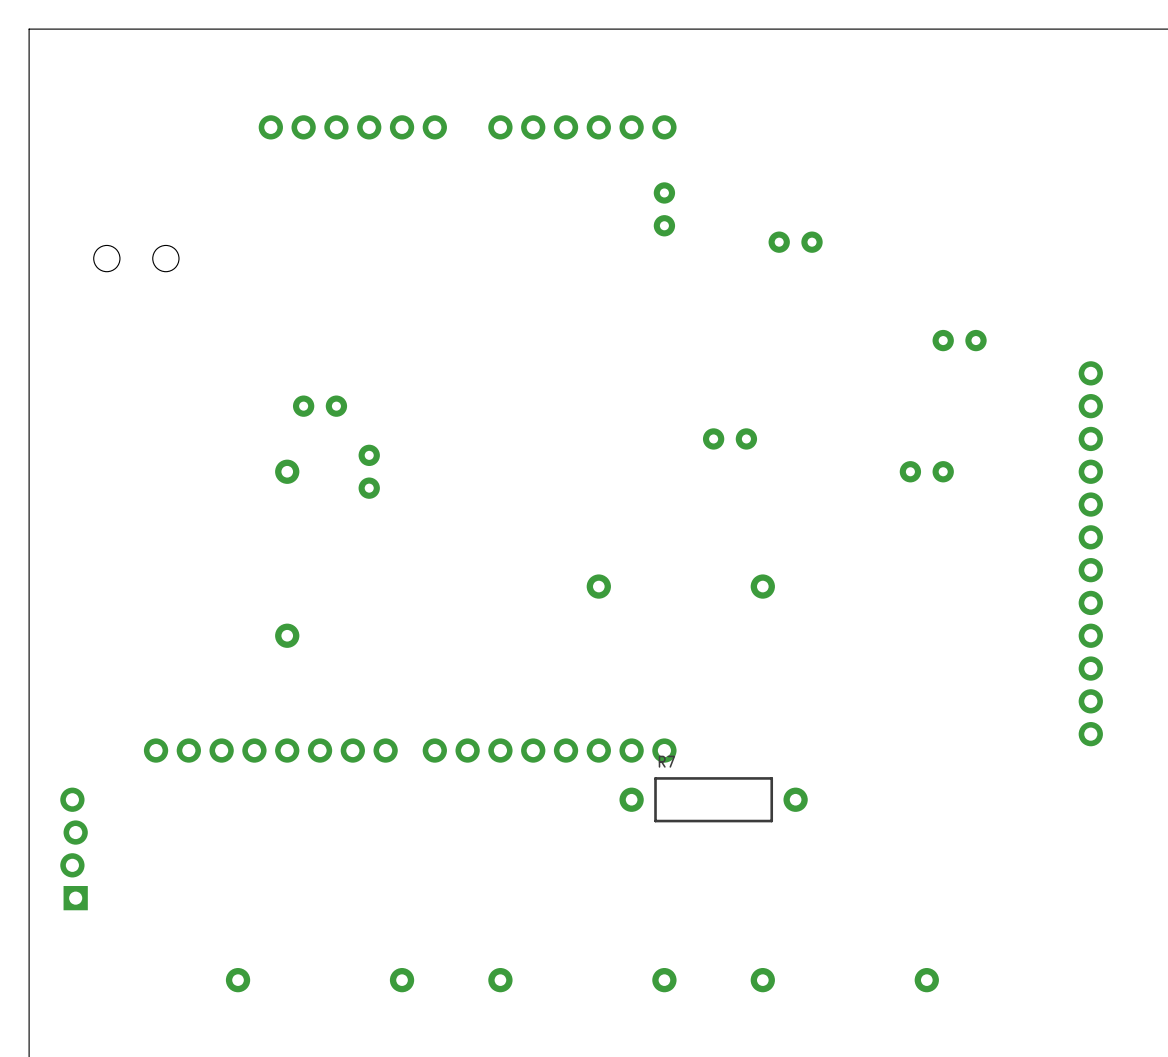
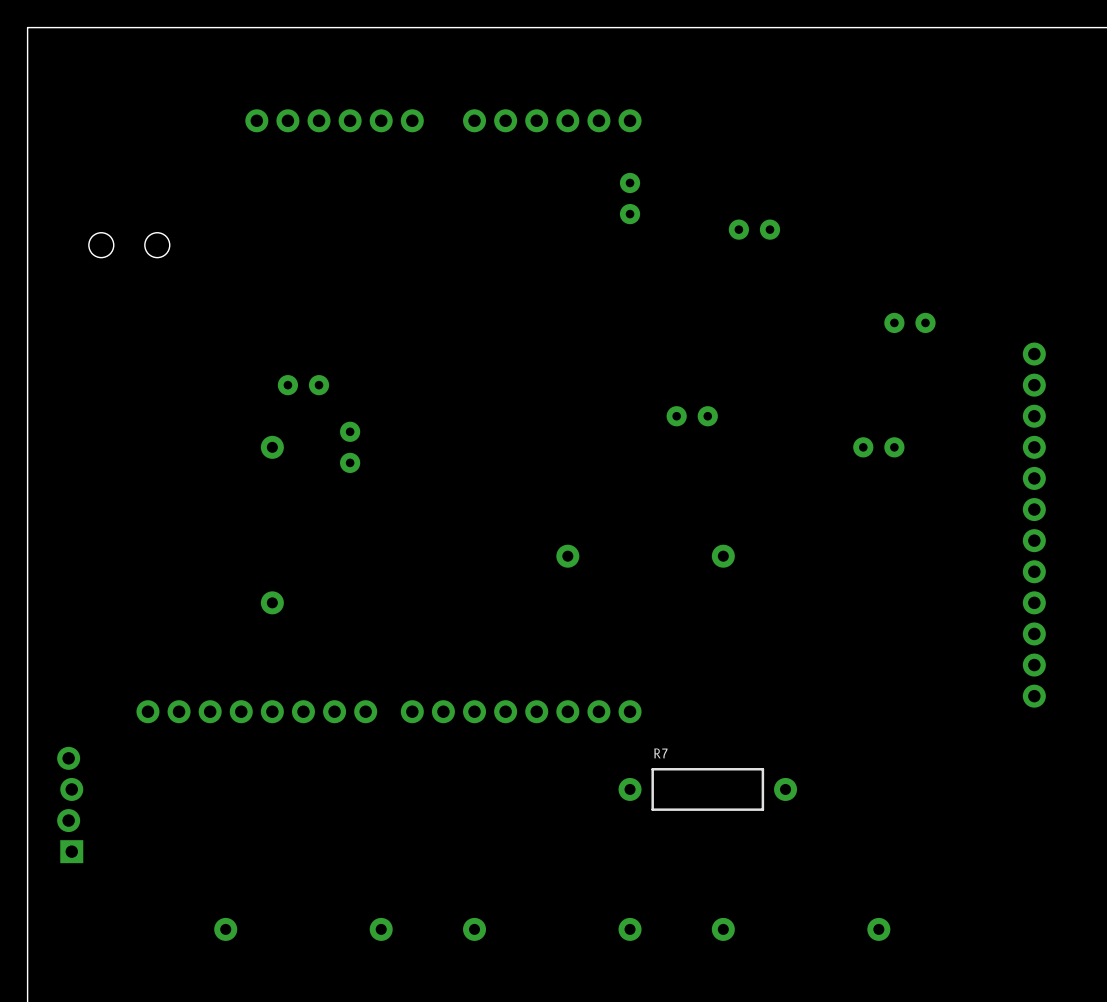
R7 position: (713, 799) -> (707, 789)

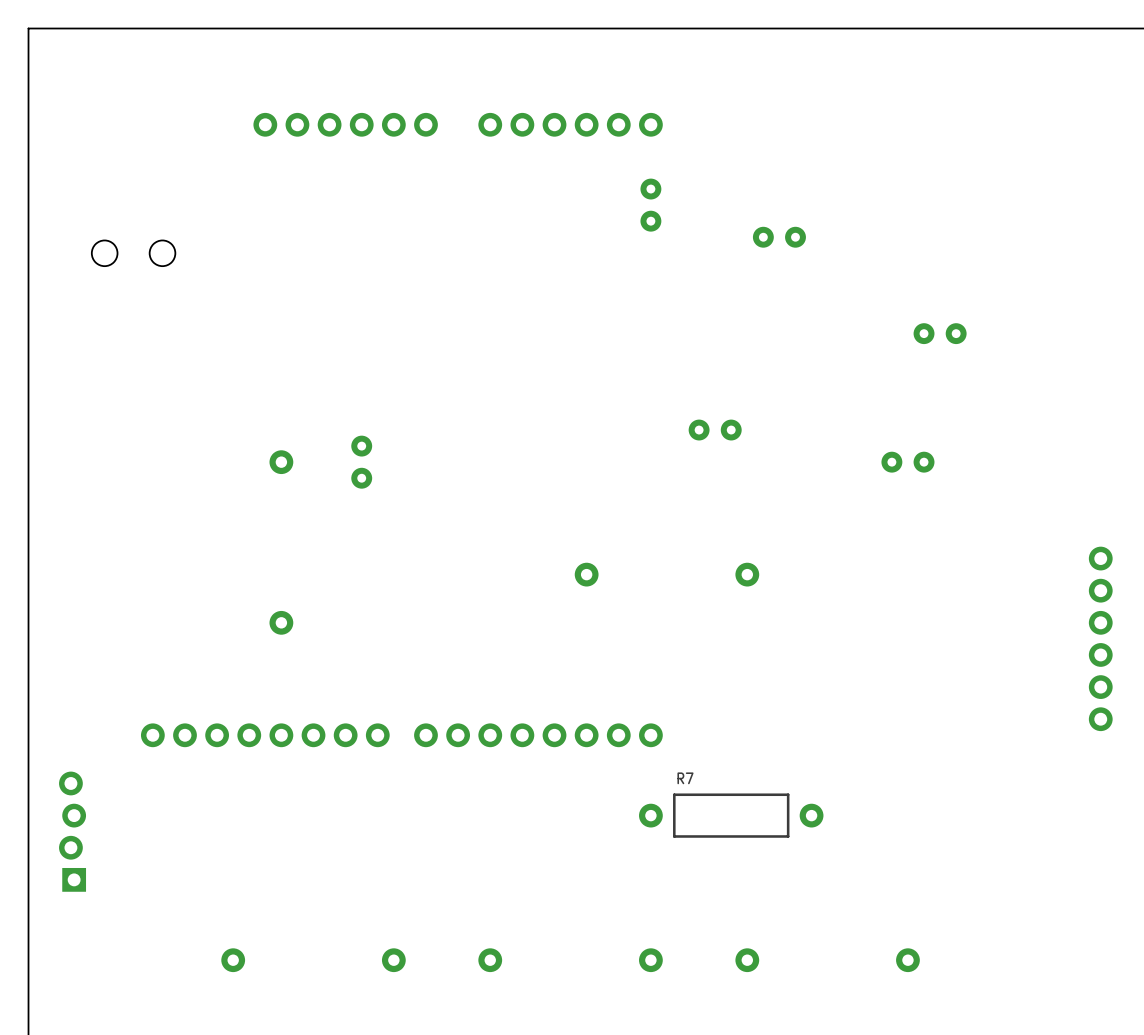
part: (303, 385) -> none
part: (1034, 431) -> none
part position: (1034, 618) -> (1100, 638)

